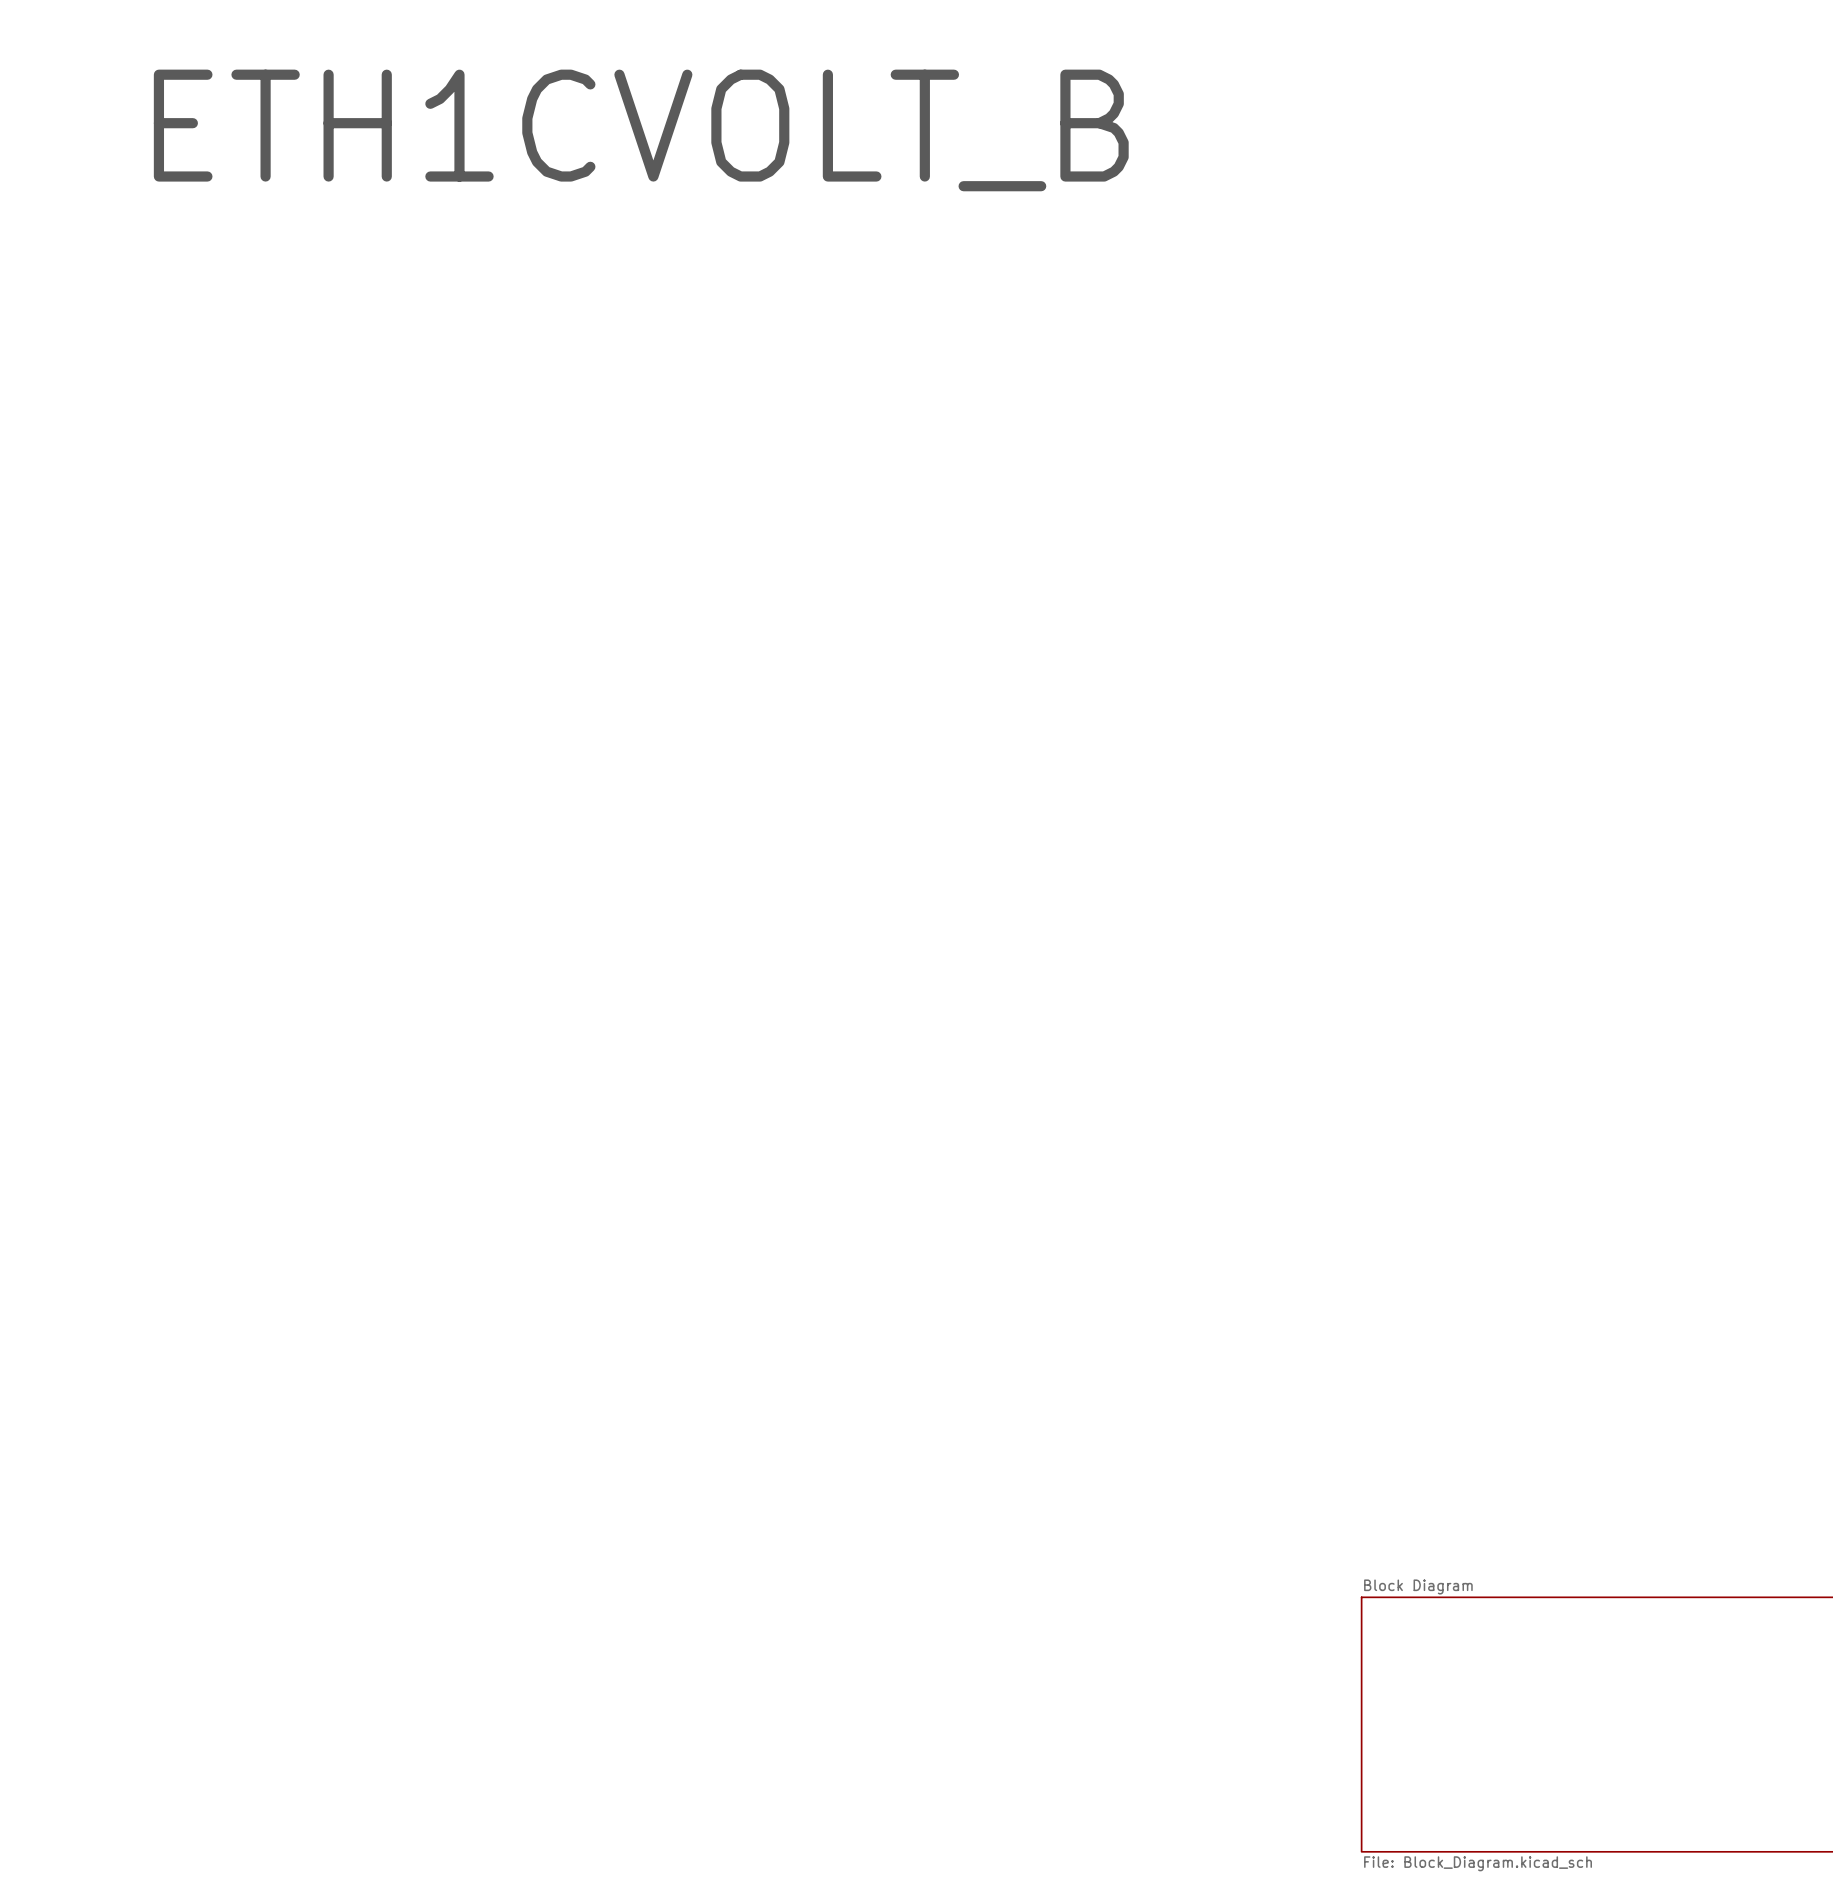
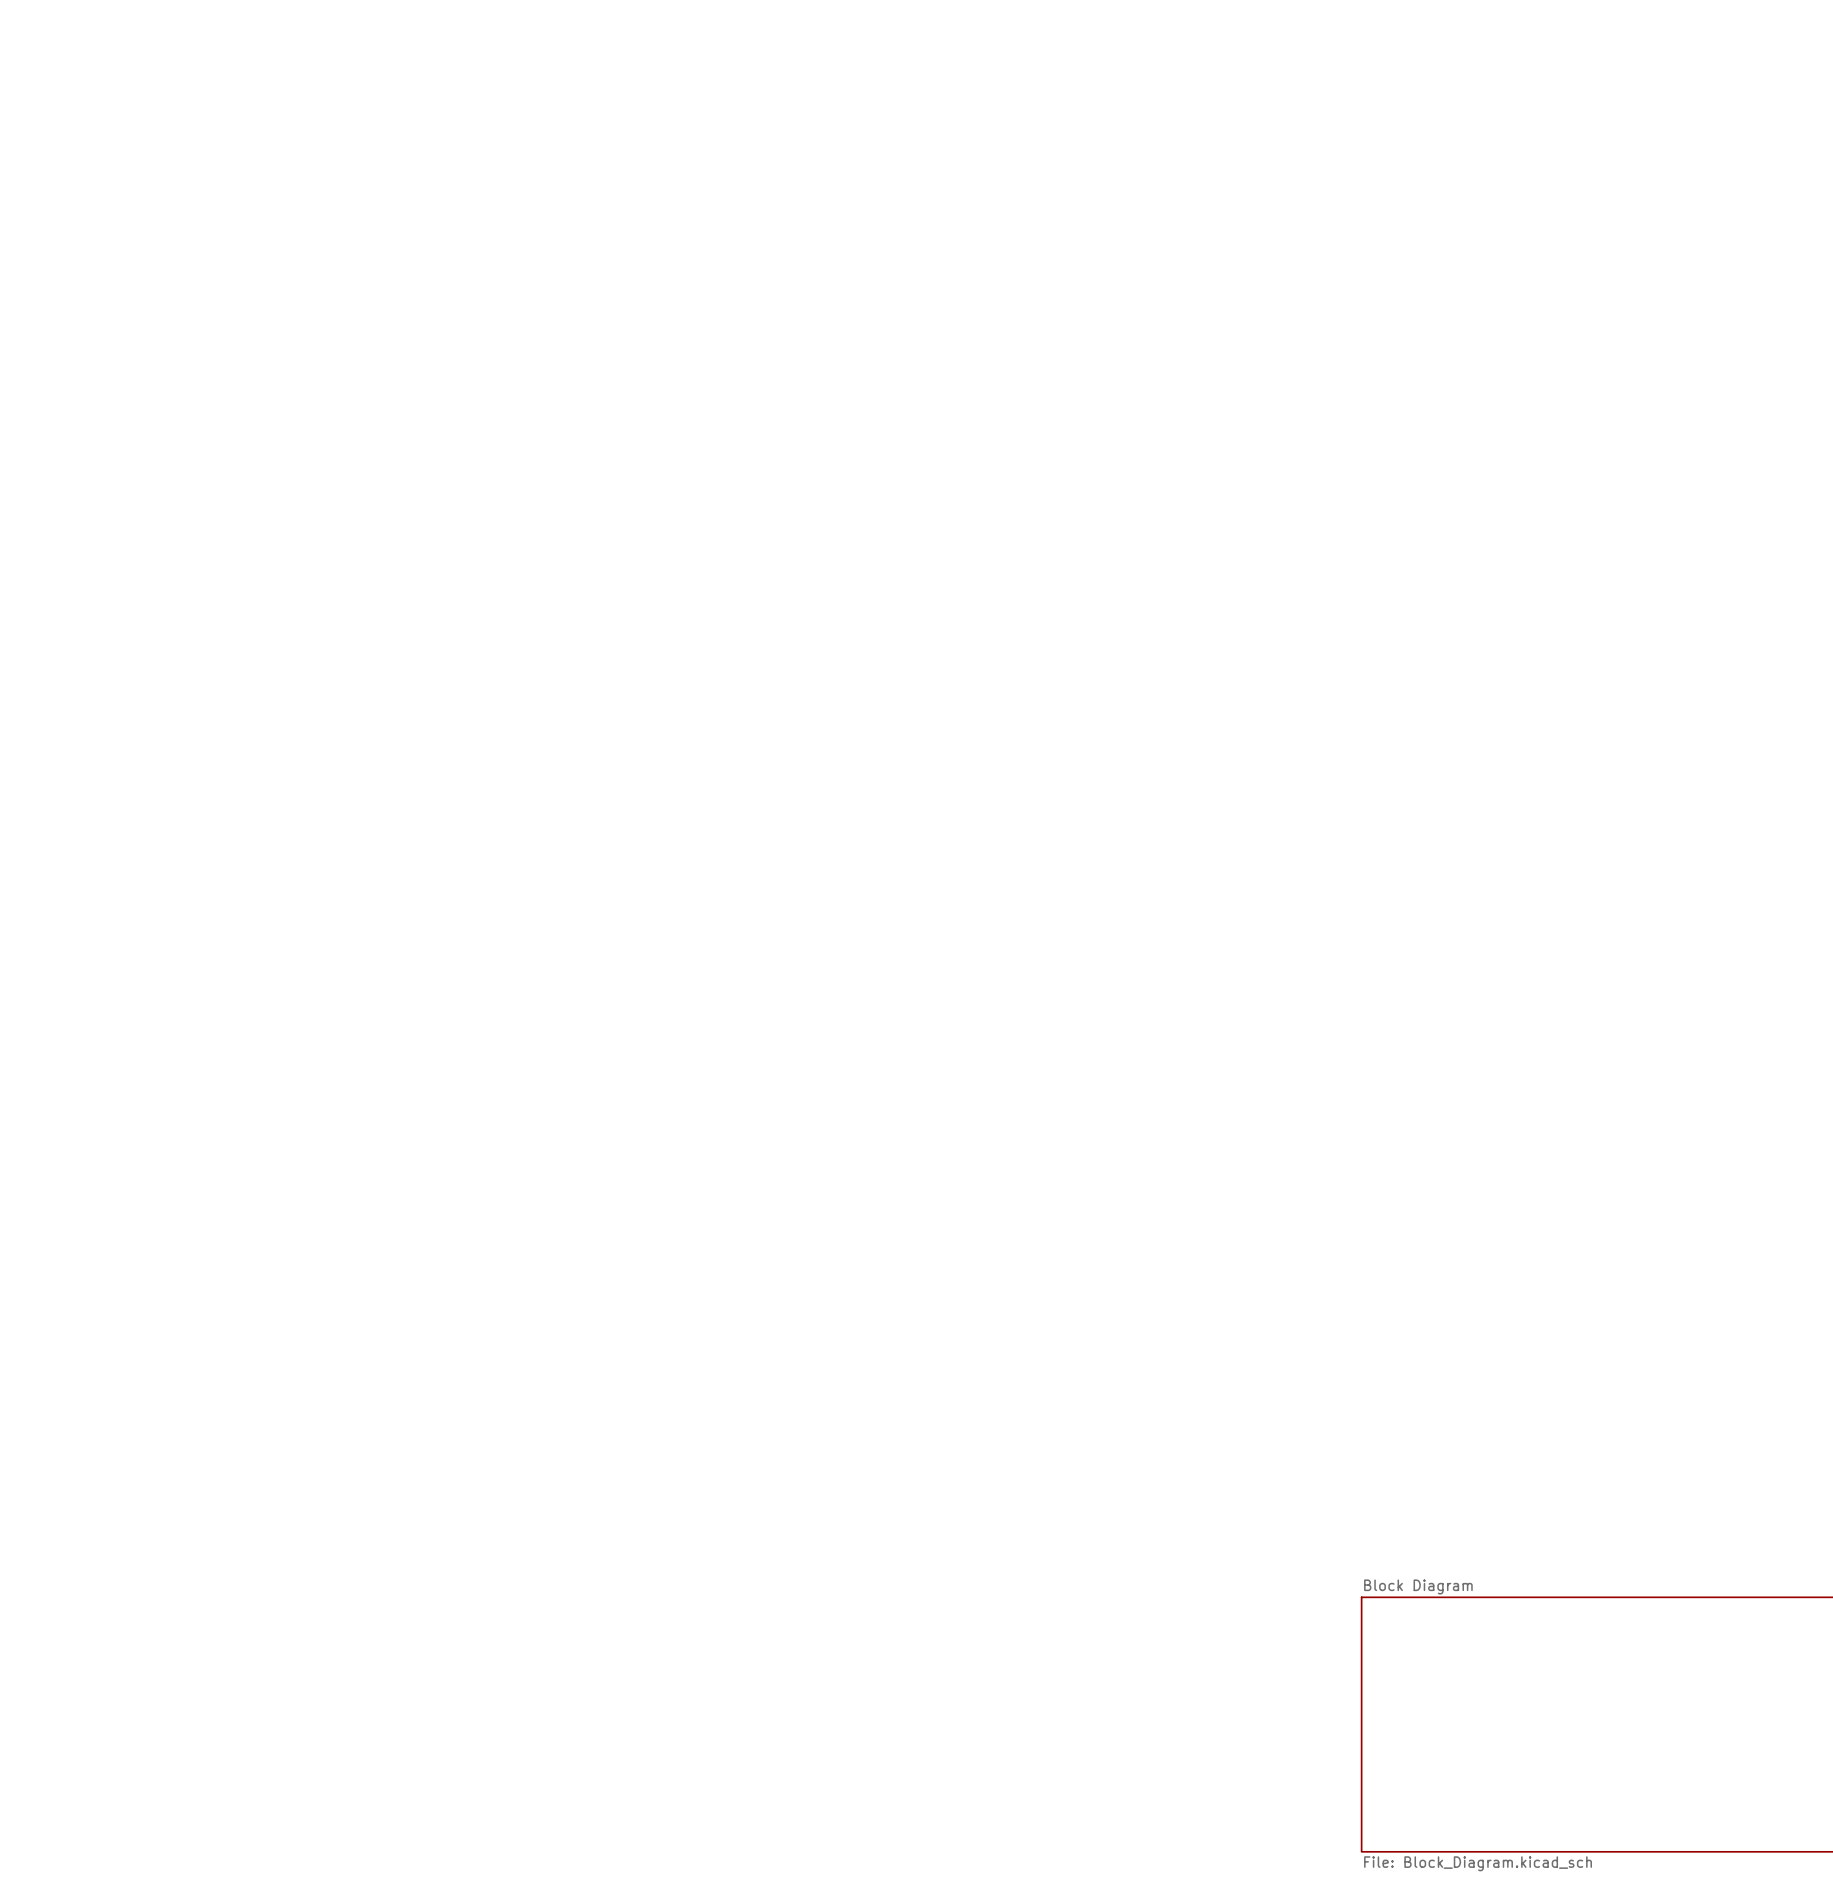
text: ETH1CVOLT_B (641, 130) -> none

